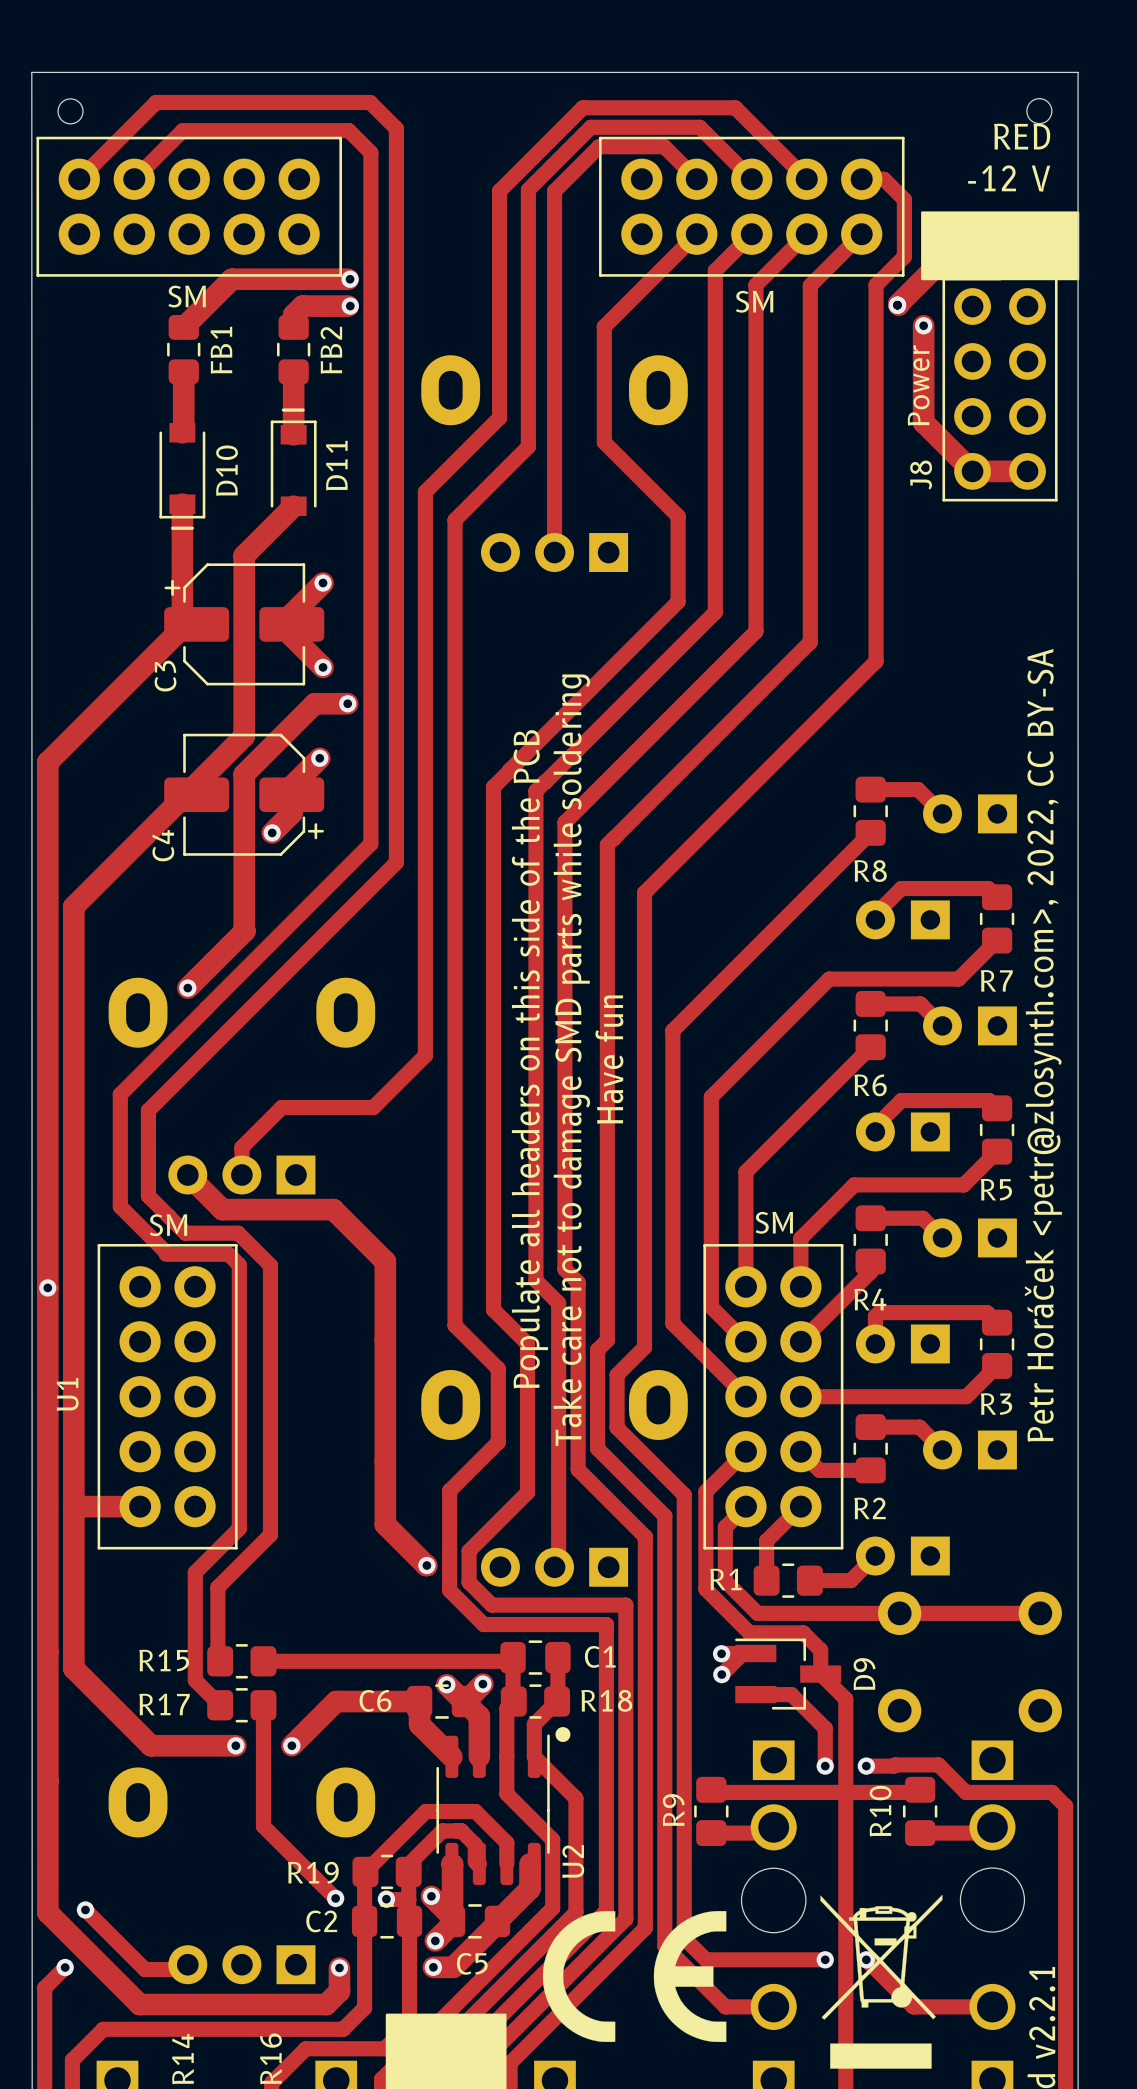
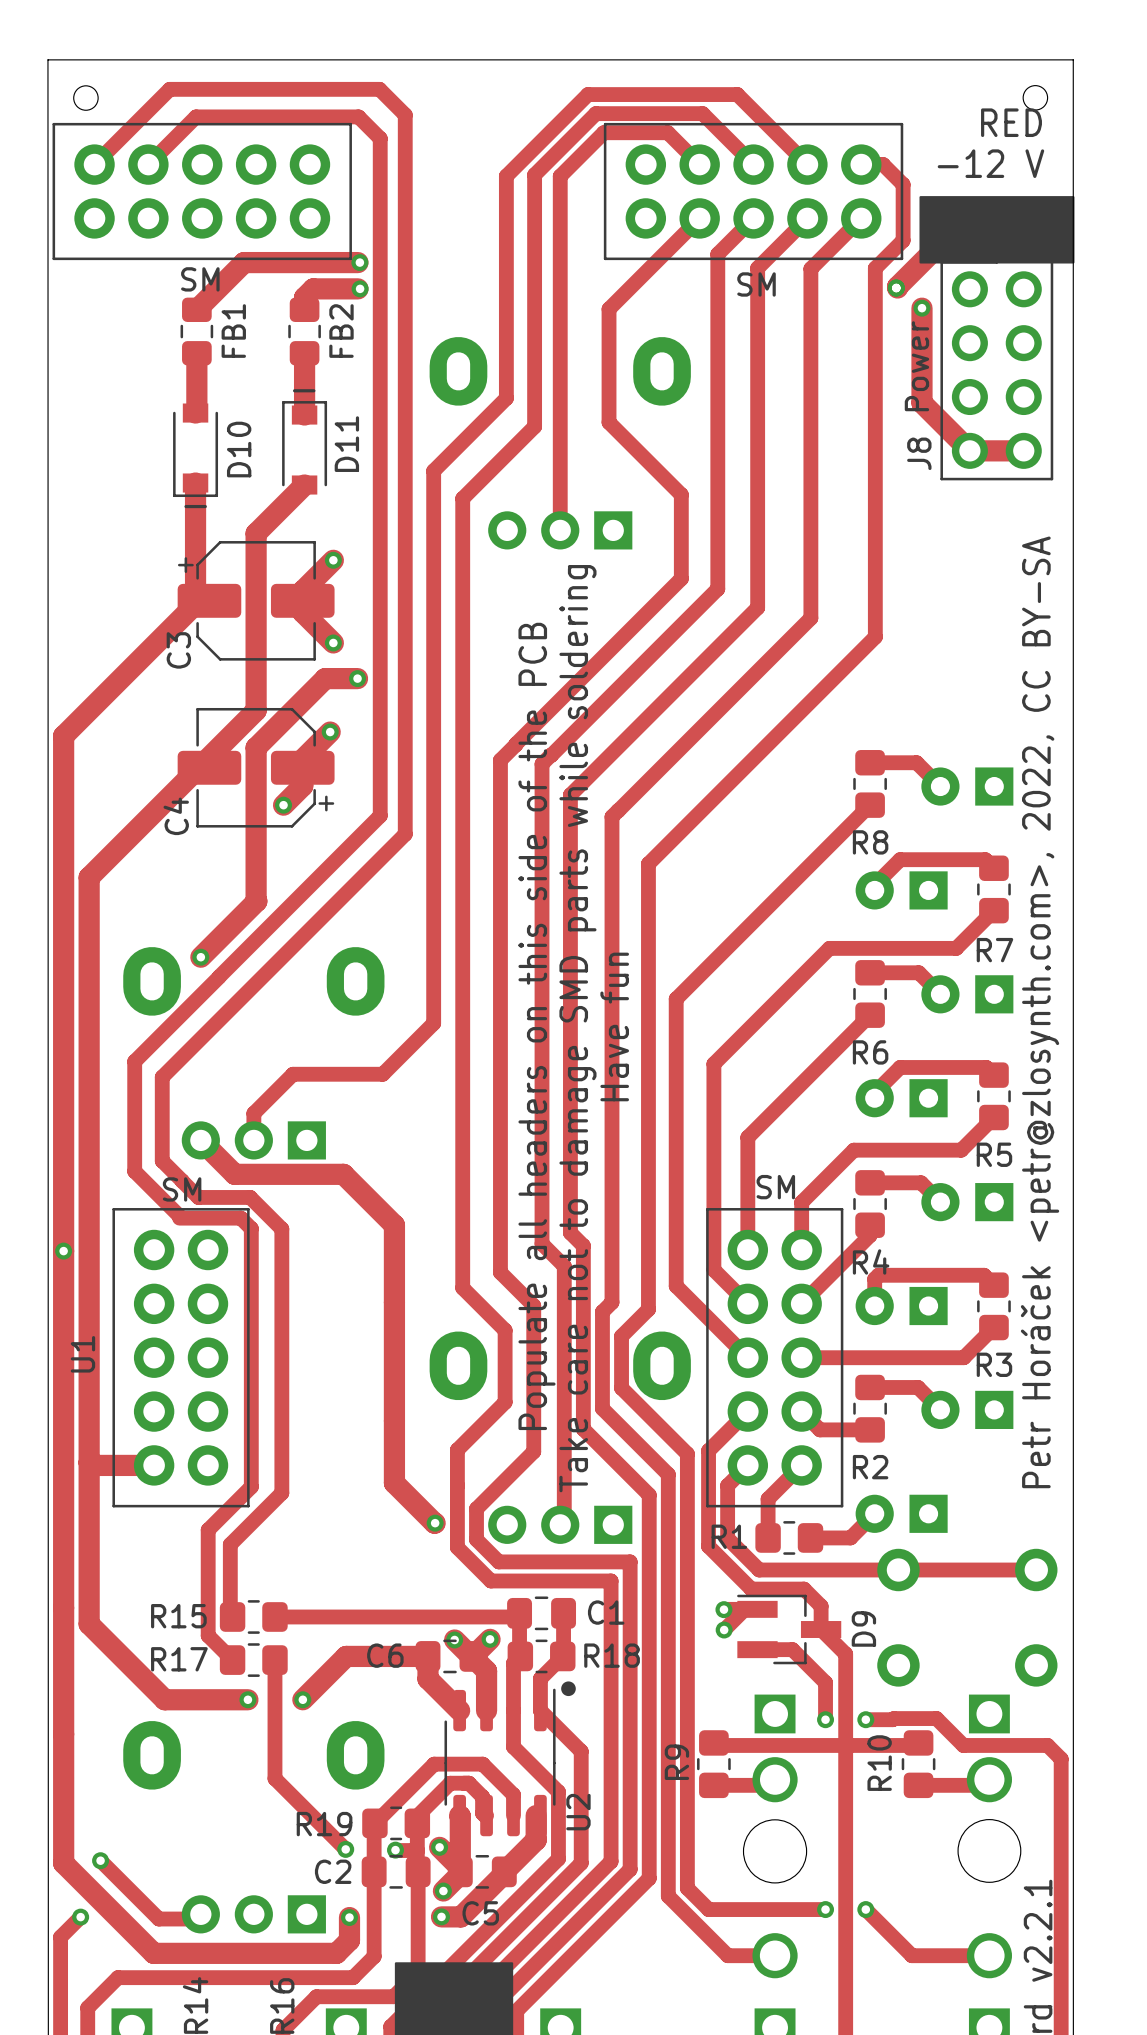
drawing: [820, 1894, 943, 2069] -> none
drawing: [542, 1911, 727, 2043] -> none

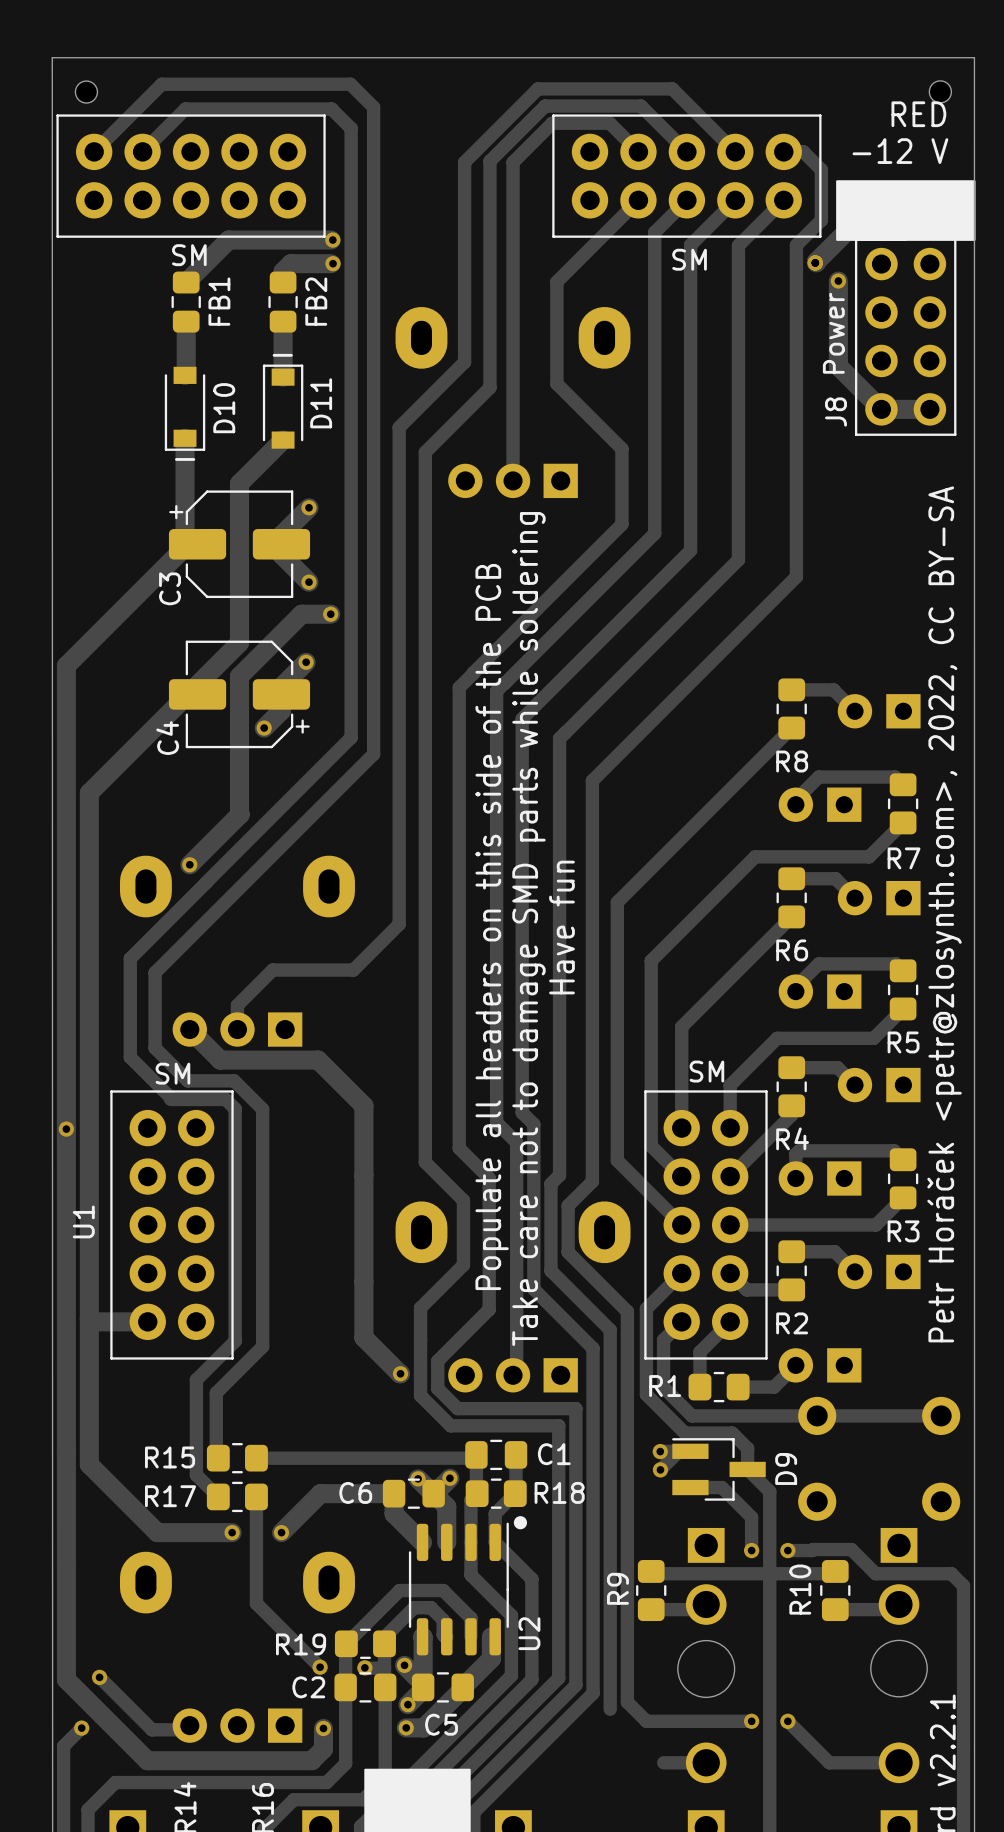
track: (668, 1896) (727, 1955) -> none

